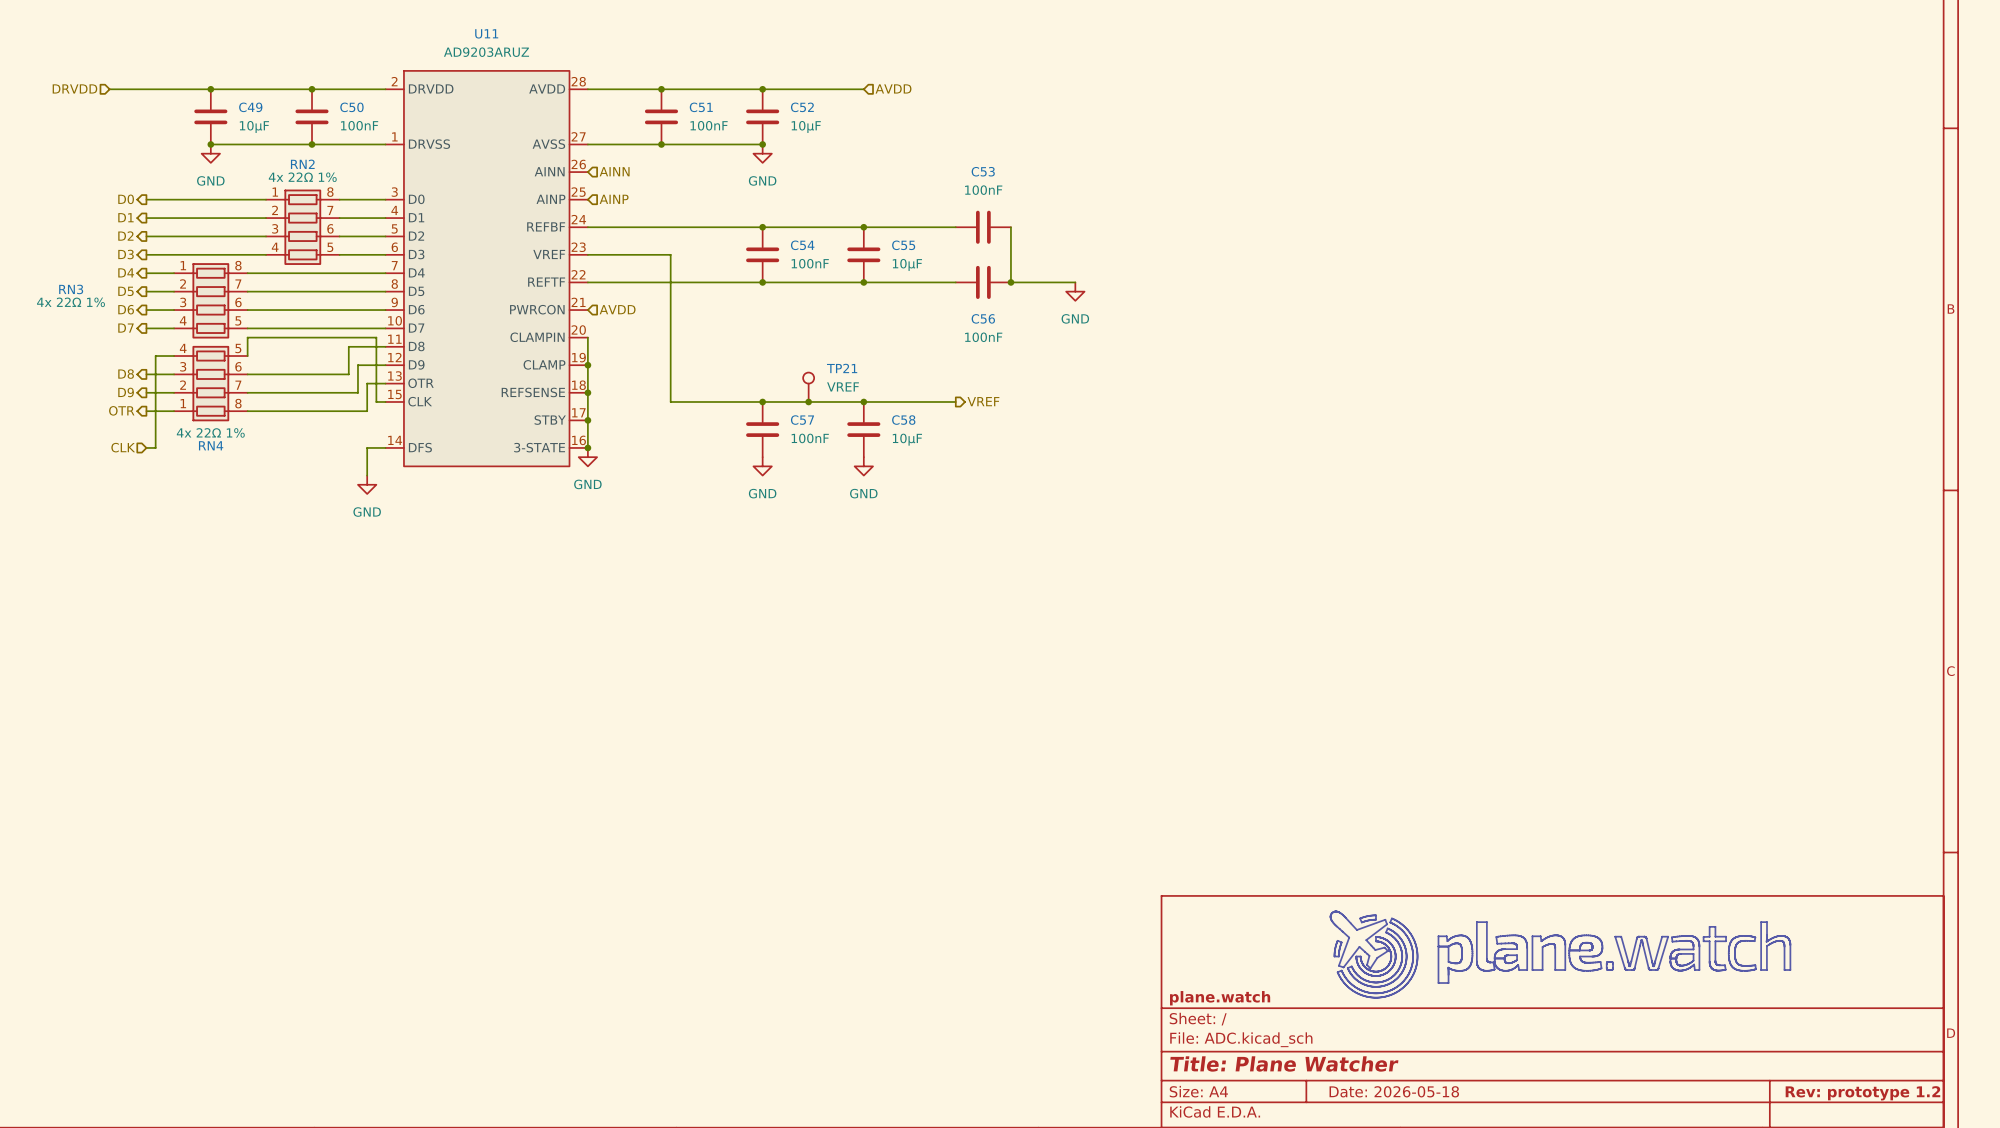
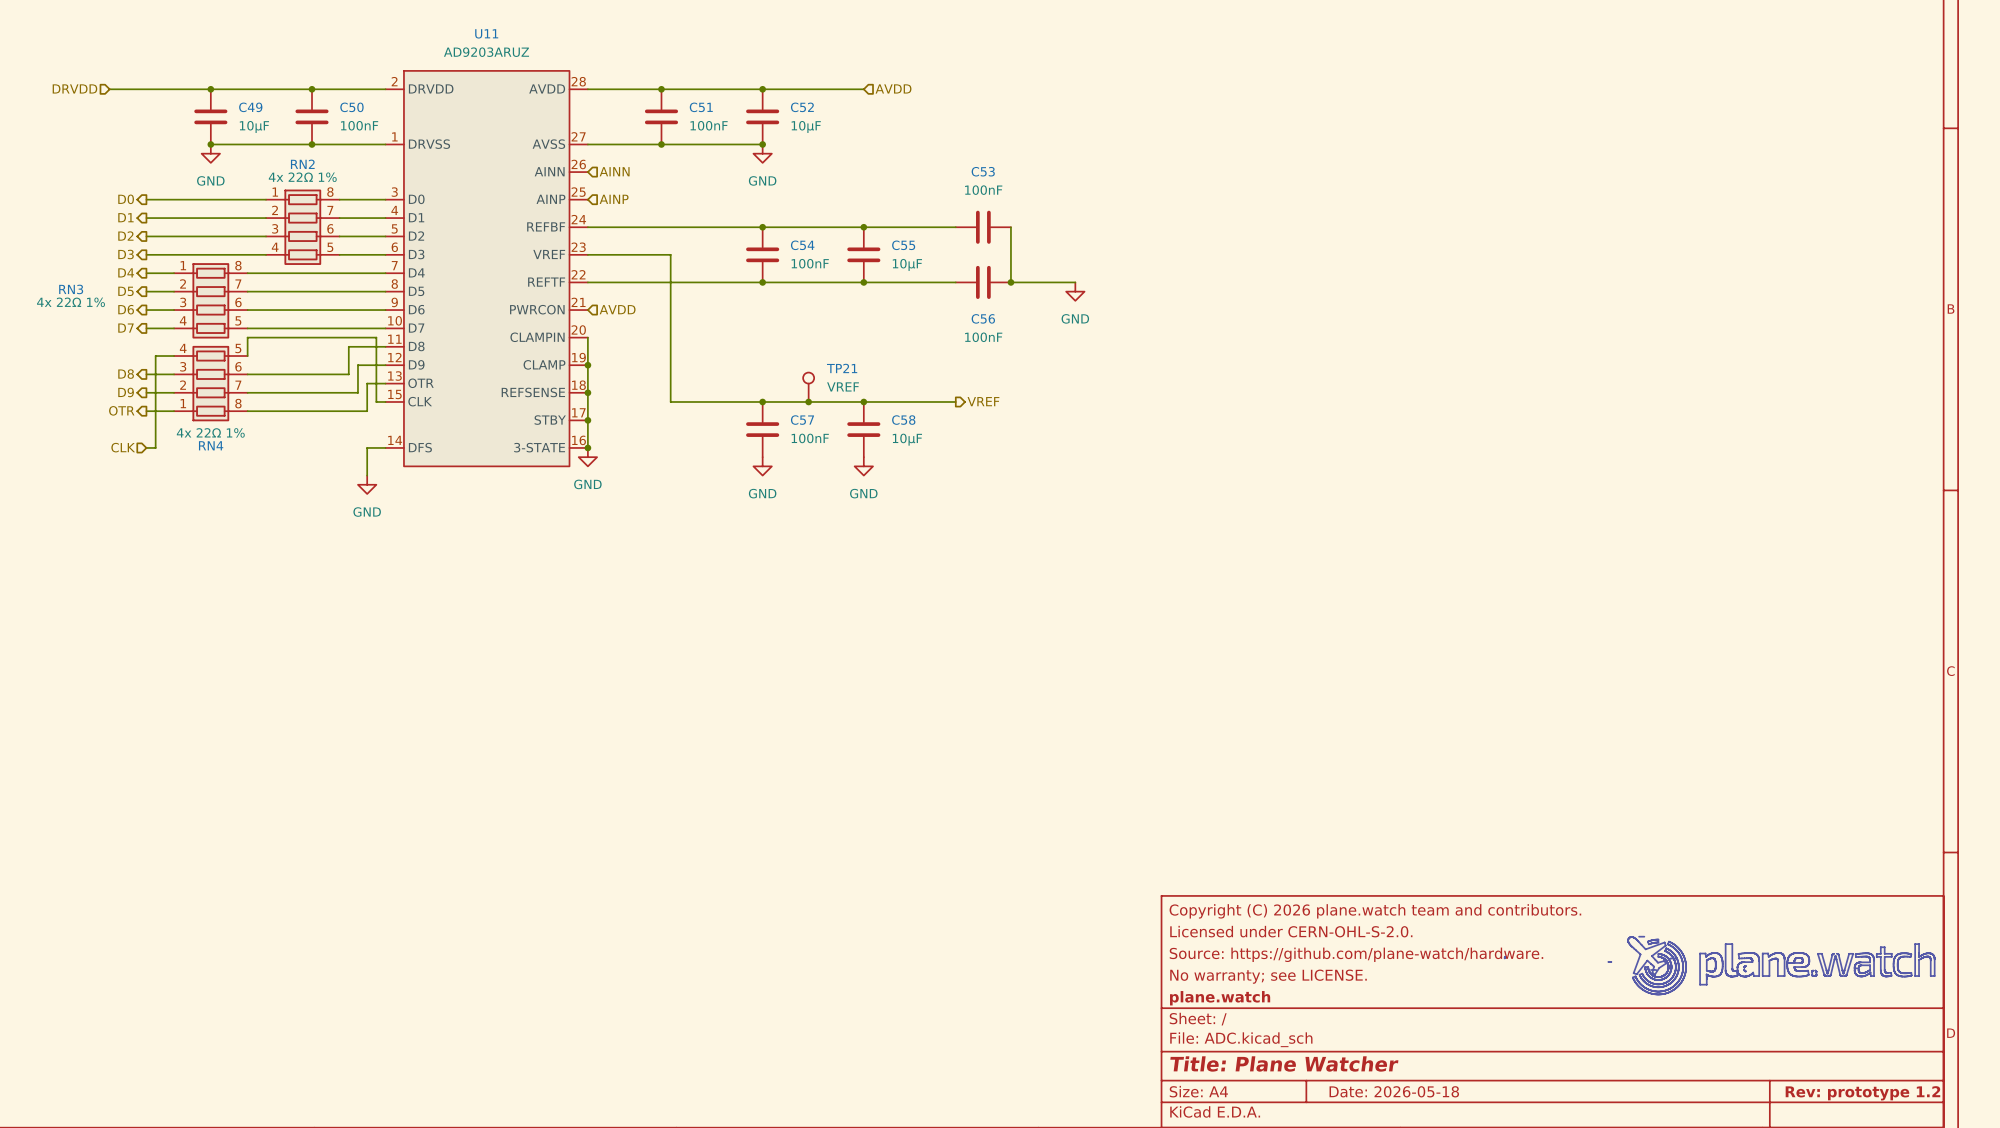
line: (1335, 911) (1331, 914) (1331, 920) (1349, 937) (1338, 965) (1343, 967) (1359, 946) (1369, 955) (1367, 965) (1370, 968) (1377, 957) (1387, 951) (1384, 947) (1375, 950) (1366, 940) (1387, 924) (1385, 919) (1356, 929) (1342, 914) (1335, 911) -> none
title block: none -> Copyright (C) 2026 plane.watch team and contributors. (1375, 911)
line: (1374, 915) (1366, 916) (1360, 918) (1361, 922) (1376, 919) (1374, 915) -> none
line: (1391, 918) (1390, 922) (1402, 931) (1411, 944) (1413, 958) (1409, 971) (1396, 987) (1386, 991) (1376, 993) (1357, 988) (1348, 981) (1341, 970) (1337, 972) (1346, 985) (1359, 994) (1374, 997) (1390, 994) (1404, 986) (1413, 973) (1417, 956) (1414, 940) (1405, 927) (1391, 918) -> none
line: (1476, 922) (1486, 922) (1486, 959) (1493, 962) (1493, 969) (1483, 970) (1477, 965) (1476, 922) -> none
line: (1761, 922) (1761, 970) (1766, 970) (1766, 946) (1779, 940) (1784, 944) (1784, 970) (1790, 970) (1789, 939) (1785, 936) (1779, 935) (1766, 941) (1767, 922) (1761, 922) -> none
line: (1709, 926) (1709, 936) (1703, 937) (1703, 941) (1709, 941) (1710, 965) (1715, 970) (1725, 969) (1725, 965) (1715, 963) (1715, 941) (1726, 941) (1726, 936) (1715, 936) (1715, 926) (1709, 926) -> none
line: (1387, 928) (1386, 932) (1395, 938) (1400, 948) (1402, 957) (1399, 967) (1390, 978) (1376, 982) (1361, 978) (1351, 966) (1347, 968) (1354, 977) (1363, 984) (1375, 986) (1387, 984) (1397, 978) (1403, 968) (1406, 957) (1404, 945) (1398, 935) (1387, 928) -> none
title block: none -> Licensed under CERN-OHL-S-2.0. (1291, 931)
line: (1459, 935) (1447, 941) (1446, 936) (1438, 936) (1438, 983) (1448, 983) (1448, 967) (1462, 970) (1470, 964) (1472, 953) (1471, 942) (1466, 936) (1459, 935) -> none
line: (1512, 935) (1496, 936) (1497, 943) (1514, 943) (1517, 949) (1497, 951) (1494, 956) (1495, 965) (1503, 970) (1511, 969) (1518, 964) (1519, 970) (1527, 970) (1526, 941) (1521, 936) (1512, 935) -> none
line: (1554, 935) (1541, 941) (1540, 936) (1532, 936) (1532, 970) (1542, 970) (1542, 946) (1551, 943) (1555, 946) (1555, 970) (1565, 970) (1564, 941) (1561, 936) (1554, 935) -> none
line: (1688, 935) (1671, 937) (1672, 941) (1689, 940) (1693, 944) (1693, 949) (1677, 949) (1671, 952) (1670, 964) (1676, 970) (1685, 969) (1694, 964) (1694, 970) (1699, 970) (1698, 941) (1694, 937) (1688, 935) -> none
line: (1744, 935) (1735, 937) (1730, 942) (1728, 951) (1730, 963) (1733, 967) (1738, 970) (1755, 969) (1755, 965) (1741, 965) (1735, 960) (1735, 949) (1737, 943) (1742, 940) (1754, 941) (1755, 937) (1744, 935) -> none
line: (1376, 937) (1376, 941) (1384, 944) (1390, 951) (1390, 959) (1386, 967) (1379, 971) (1370, 970) (1363, 965) (1360, 956) (1356, 956) (1362, 970) (1376, 976) (1389, 970) (1395, 956) (1389, 942) (1376, 937) -> none
line: none -> (1631, 937) (1628, 939) (1628, 942) (1640, 954) (1633, 973) (1636, 974) (1647, 960) (1654, 966) (1652, 972) (1654, 974) (1659, 967) (1666, 963) (1664, 961) (1657, 962) (1651, 956) (1665, 945) (1664, 942) (1645, 949) (1636, 939) (1631, 937)
line: (1636, 938) (1629, 966) (1621, 936) (1615, 936) (1624, 968) -> none
line: (1646, 938) (1654, 966) (1662, 936) (1668, 936) (1658, 968) -> none
line: none -> (1658, 939) (1658, 942) (1648, 944) (1647, 941) (1658, 939)
line: (1337, 940) (1335, 948) (1334, 956) (1338, 956) (1341, 942) (1337, 940) -> none
line: none -> (1668, 941) (1667, 944) (1676, 950) (1681, 959) (1683, 968) (1681, 976) (1672, 987) (1658, 991) (1646, 988) (1635, 976) (1632, 977) (1638, 986) (1647, 992) (1657, 994) (1668, 992) (1677, 986) (1683, 977) (1686, 967) (1683, 956) (1677, 947) (1668, 941)
line: none -> (1915, 944) (1919, 944) (1918, 957) (1927, 953) (1933, 955) (1934, 976) (1930, 976) (1930, 959) (1927, 956) (1919, 960) (1919, 976) (1915, 976) (1915, 944)
line: (1448, 946) (1448, 962) (1459, 962) (1462, 956) (1460, 945) (1455, 943) (1448, 946) -> none
line: none -> (1666, 948) (1665, 951) (1671, 955) (1675, 962) (1674, 974) (1668, 981) (1658, 984) (1648, 981) (1642, 973) (1639, 974) (1650, 985) (1657, 987) (1665, 985) (1672, 981) (1677, 975) (1678, 967) (1677, 959) (1672, 952) (1666, 948)
line: (1569, 950) (1570, 962) (1575, 968) (1586, 970) (1601, 968) (1600, 962) (1584, 962) (1580, 956) (1595, 956) (1600, 953) (1602, 944) (1597, 937) (1586, 935) (1576, 937) (1571, 941) (1569, 950) -> none
line: (1569, 950) (1589, 950) (1590, 950) (1592, 944) (1582, 943) (1580, 945) (1580, 947) (1579, 948) (1579, 949) (1579, 950) -> none
line: none -> (1714, 952) (1706, 956) (1705, 953) (1700, 953) (1700, 984) (1706, 984) (1706, 974) (1716, 976) (1721, 972) (1721, 957) (1718, 953) (1714, 952)
line: (1680, 953) (1693, 953) (1693, 960) (1685, 964) (1678, 965) (1676, 957) (1680, 953) -> none
line: none -> (1866, 953) (1855, 954) (1856, 957) (1867, 956) (1870, 959) (1870, 962) (1859, 962) (1855, 964) (1854, 972) (1858, 976) (1864, 975) (1870, 972) (1870, 976) (1874, 976) (1873, 956) (1866, 953)
line: none -> (1904, 953) (1898, 954) (1894, 957) (1894, 971) (1900, 976) (1911, 975) (1911, 972) (1901, 972) (1898, 969) (1899, 958) (1910, 956) (1911, 954) (1904, 953)
title block: none -> Source: https://github.com/plane-watch/hardware. (1356, 954)
line: none -> (1658, 954) (1658, 956) (1664, 958) (1668, 963) (1668, 969) (1665, 974) (1660, 976) (1654, 976) (1650, 972) (1648, 967) (1645, 967) (1649, 976) (1658, 980) (1667, 976) (1671, 967) (1667, 957) (1658, 954)
line: none -> (1838, 954) (1843, 973) (1849, 953) (1853, 953) (1846, 974)
line: (1505, 955) (1517, 955) (1517, 959) (1508, 963) (1505, 962) (1504, 958) (1494, 958) -> none
line: none -> (1832, 955) (1827, 973) (1821, 953) (1817, 953) (1824, 974)
line: none -> (1711, 958) (1715, 960) (1715, 969) (1712, 971) (1706, 970) (1706, 960) (1711, 958)
line: none -> (1751, 958) (1739, 958) (1738, 953) (1751, 952) (1757, 955) (1759, 976) (1753, 976) (1753, 972) (1746, 976) (1739, 974) (1737, 970) (1738, 964) (1752, 962) (1752, 959)
line: none -> (1776, 958) (1769, 960) (1769, 976) (1762, 976) (1762, 953) (1768, 953) (1768, 956) (1778, 952) (1784, 956) (1784, 976) (1777, 976) (1777, 959)
line: none -> (1801, 958) (1795, 958) (1794, 962)
line: none -> (1802, 959) (1802, 961)
line: none -> (1787, 962) (1788, 970) (1791, 975) (1798, 976) (1808, 974) (1808, 970) (1797, 970) (1794, 967) (1807, 965) (1809, 958) (1805, 954) (1791, 954) (1787, 962)
line: none -> (1801, 962) (1787, 962)
line: (1606, 963) (1606, 968) -> none
line: (1613, 963) (1613, 968) -> none
line: none -> (1860, 965) (1870, 965) (1870, 969) (1861, 973) (1858, 968) (1854, 968)
line: (1634, 968) (1641, 940) (1648, 968) -> none
line: none -> (1732, 968) (1732, 944) (1725, 944) (1725, 972) (1730, 976) (1737, 975) (1736, 970) (1734, 970)
line: (1608, 969) (1611, 969) -> none
line: (1625, 969) (1632, 970) -> none
line: none -> (1812, 971) (1812, 974)
line: none -> (1816, 971) (1816, 974)
line: none -> (1884, 971) (1884, 956) (1891, 956) (1891, 953) (1884, 953) (1884, 947) (1880, 947) (1880, 953) (1876, 954) (1876, 956) (1880, 956) (1881, 973) (1884, 976) (1891, 975) (1891, 972) (1886, 972)
line: none -> (1830, 974) (1835, 956) (1840, 974)
title block: none -> No warranty; see LICENSE. (1268, 976)
line: none -> (1813, 976) (1815, 976)
line: none -> (1825, 976) (1829, 976)
line: none -> (1841, 976) (1845, 976)

